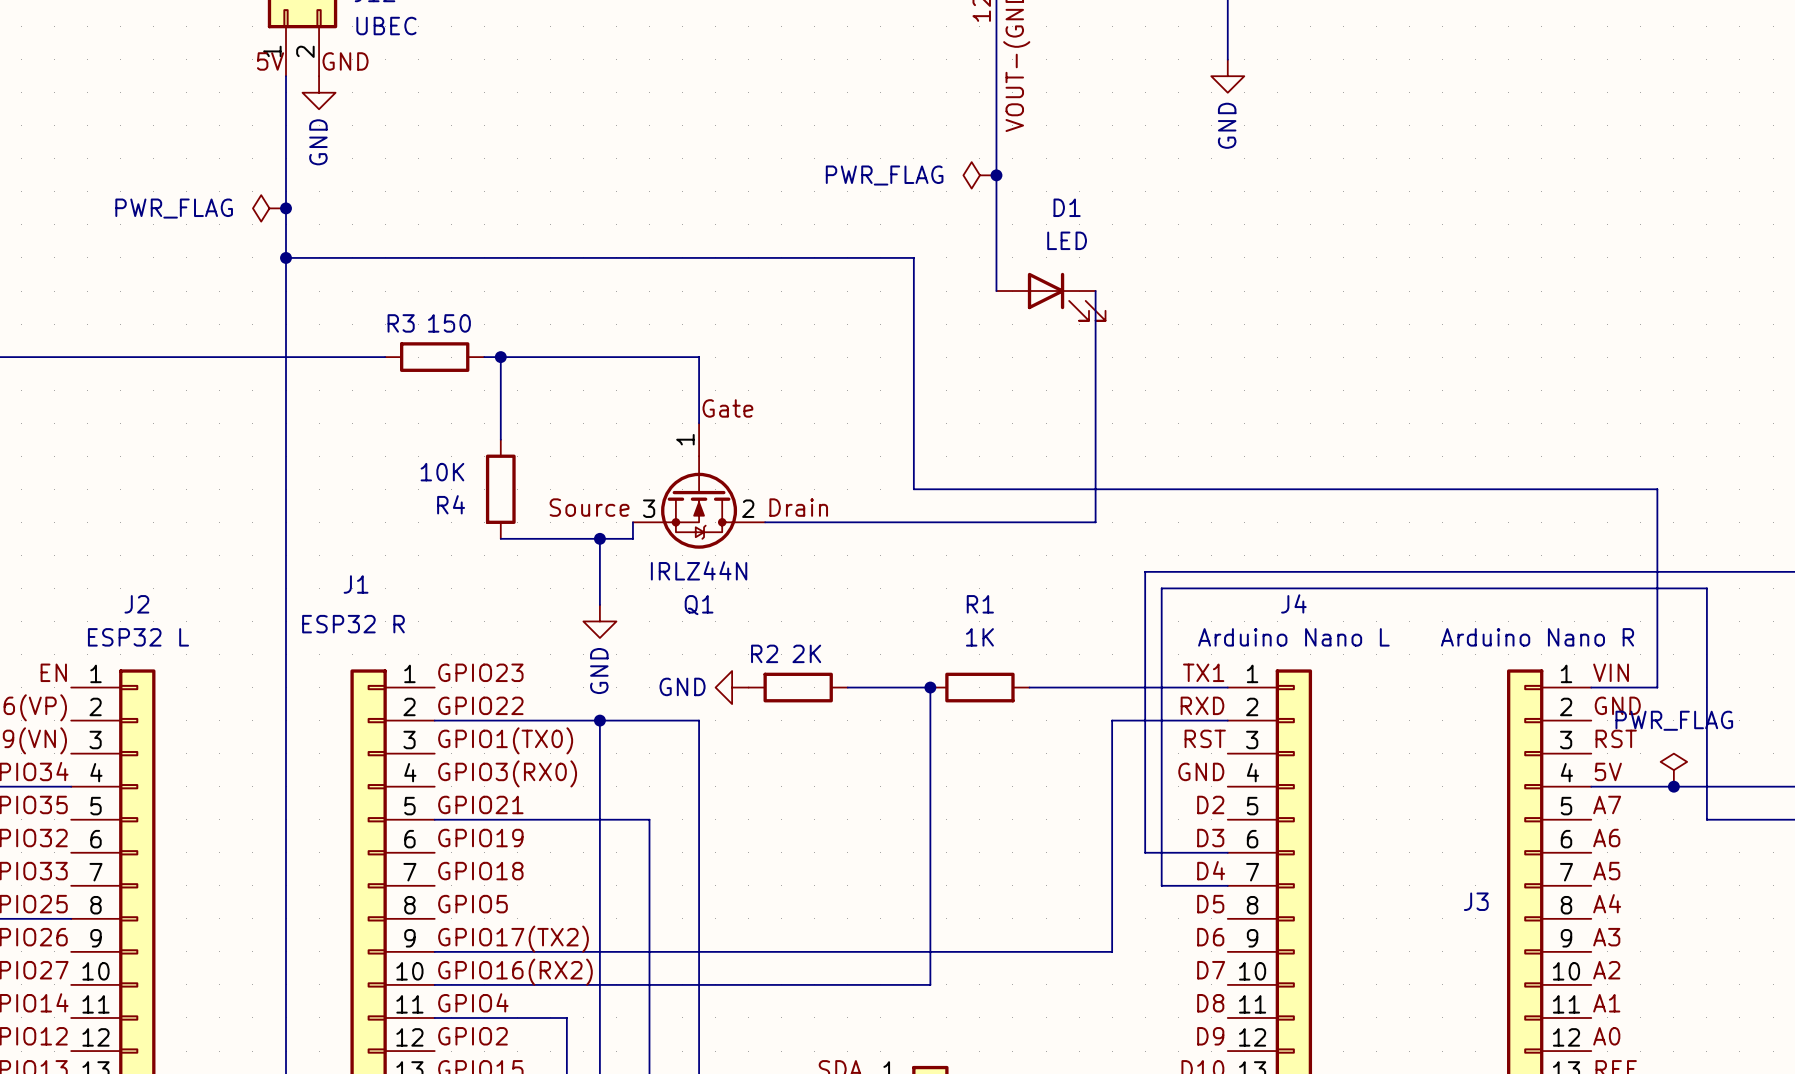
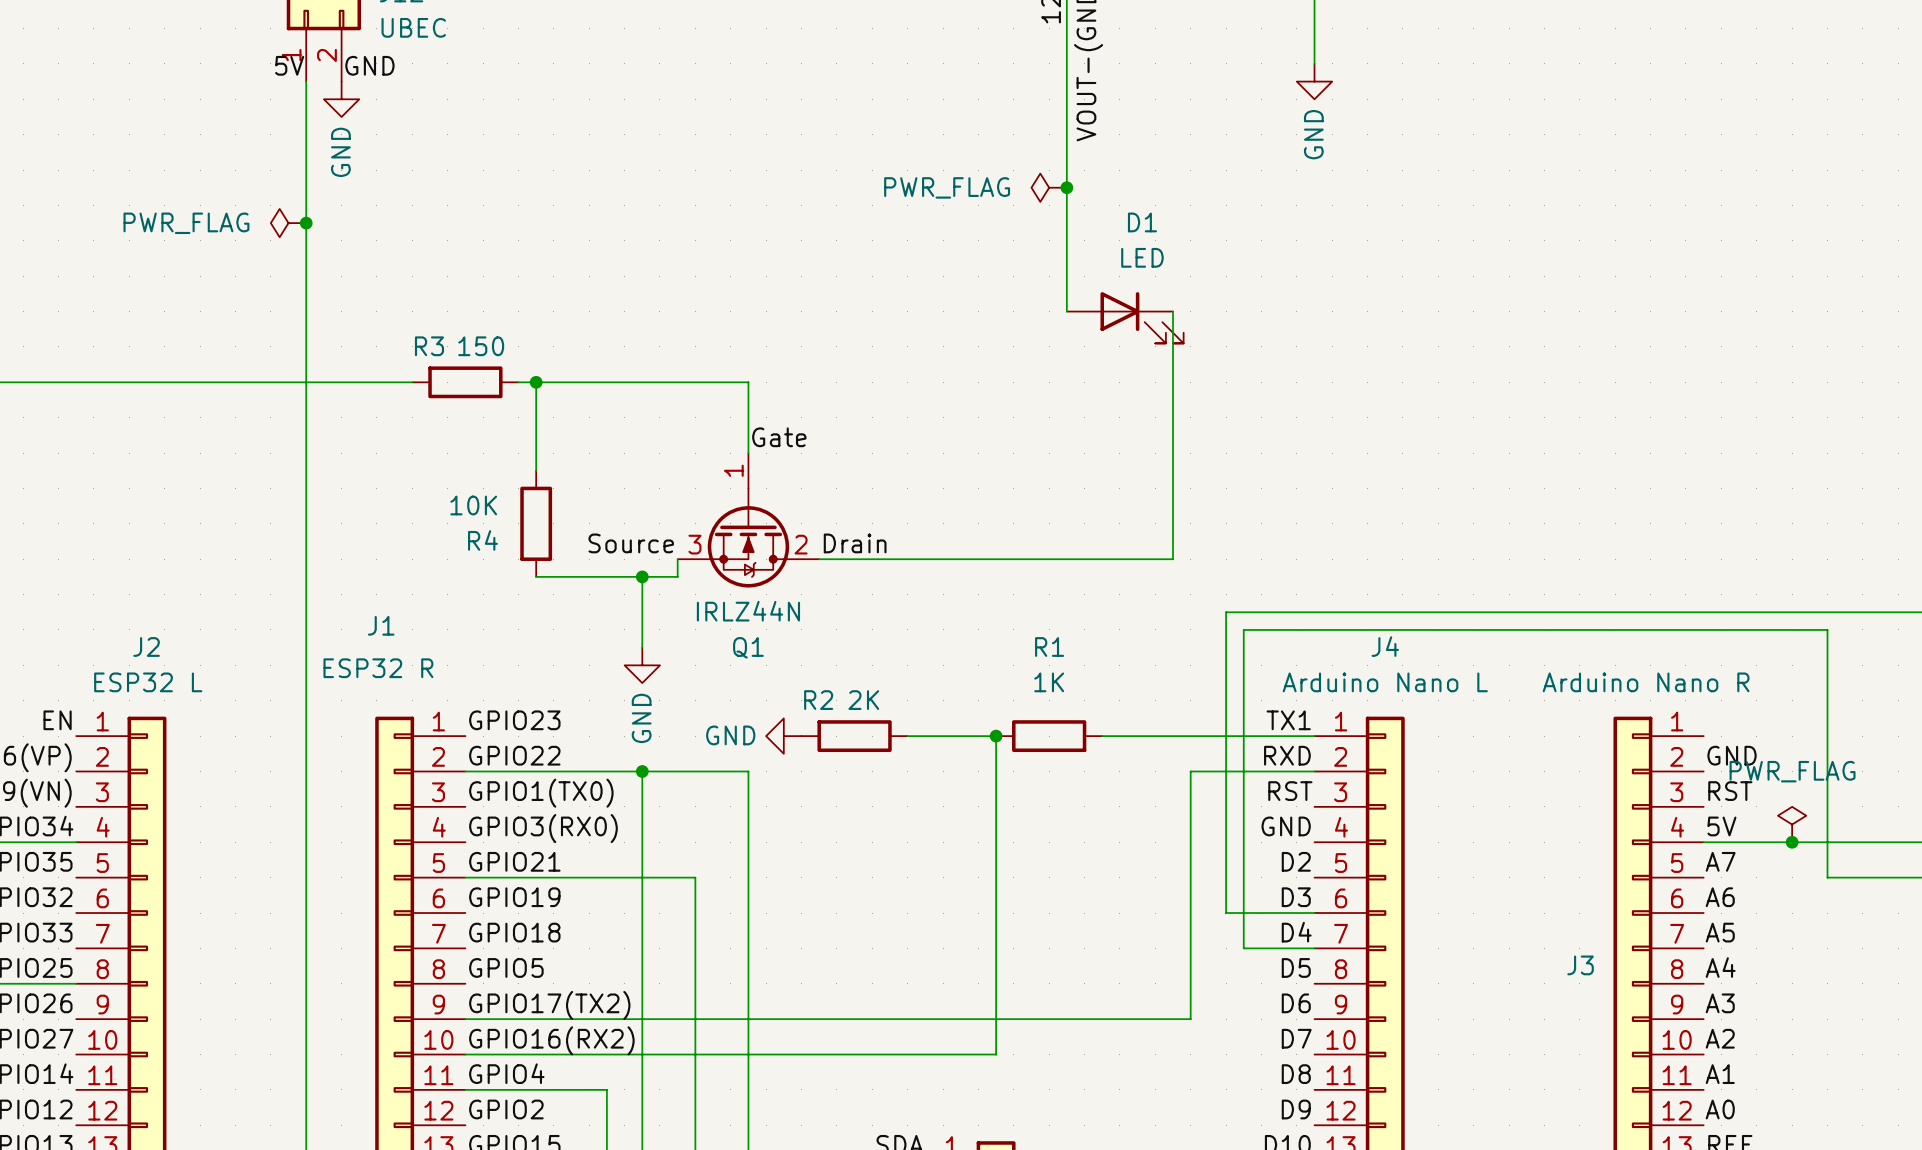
wire: (286, 257) (913, 257) (913, 489) (1657, 489) (1657, 687) (1591, 687) -> none
junction: (286, 257) -> none
label: VIN (1611, 672) -> none

